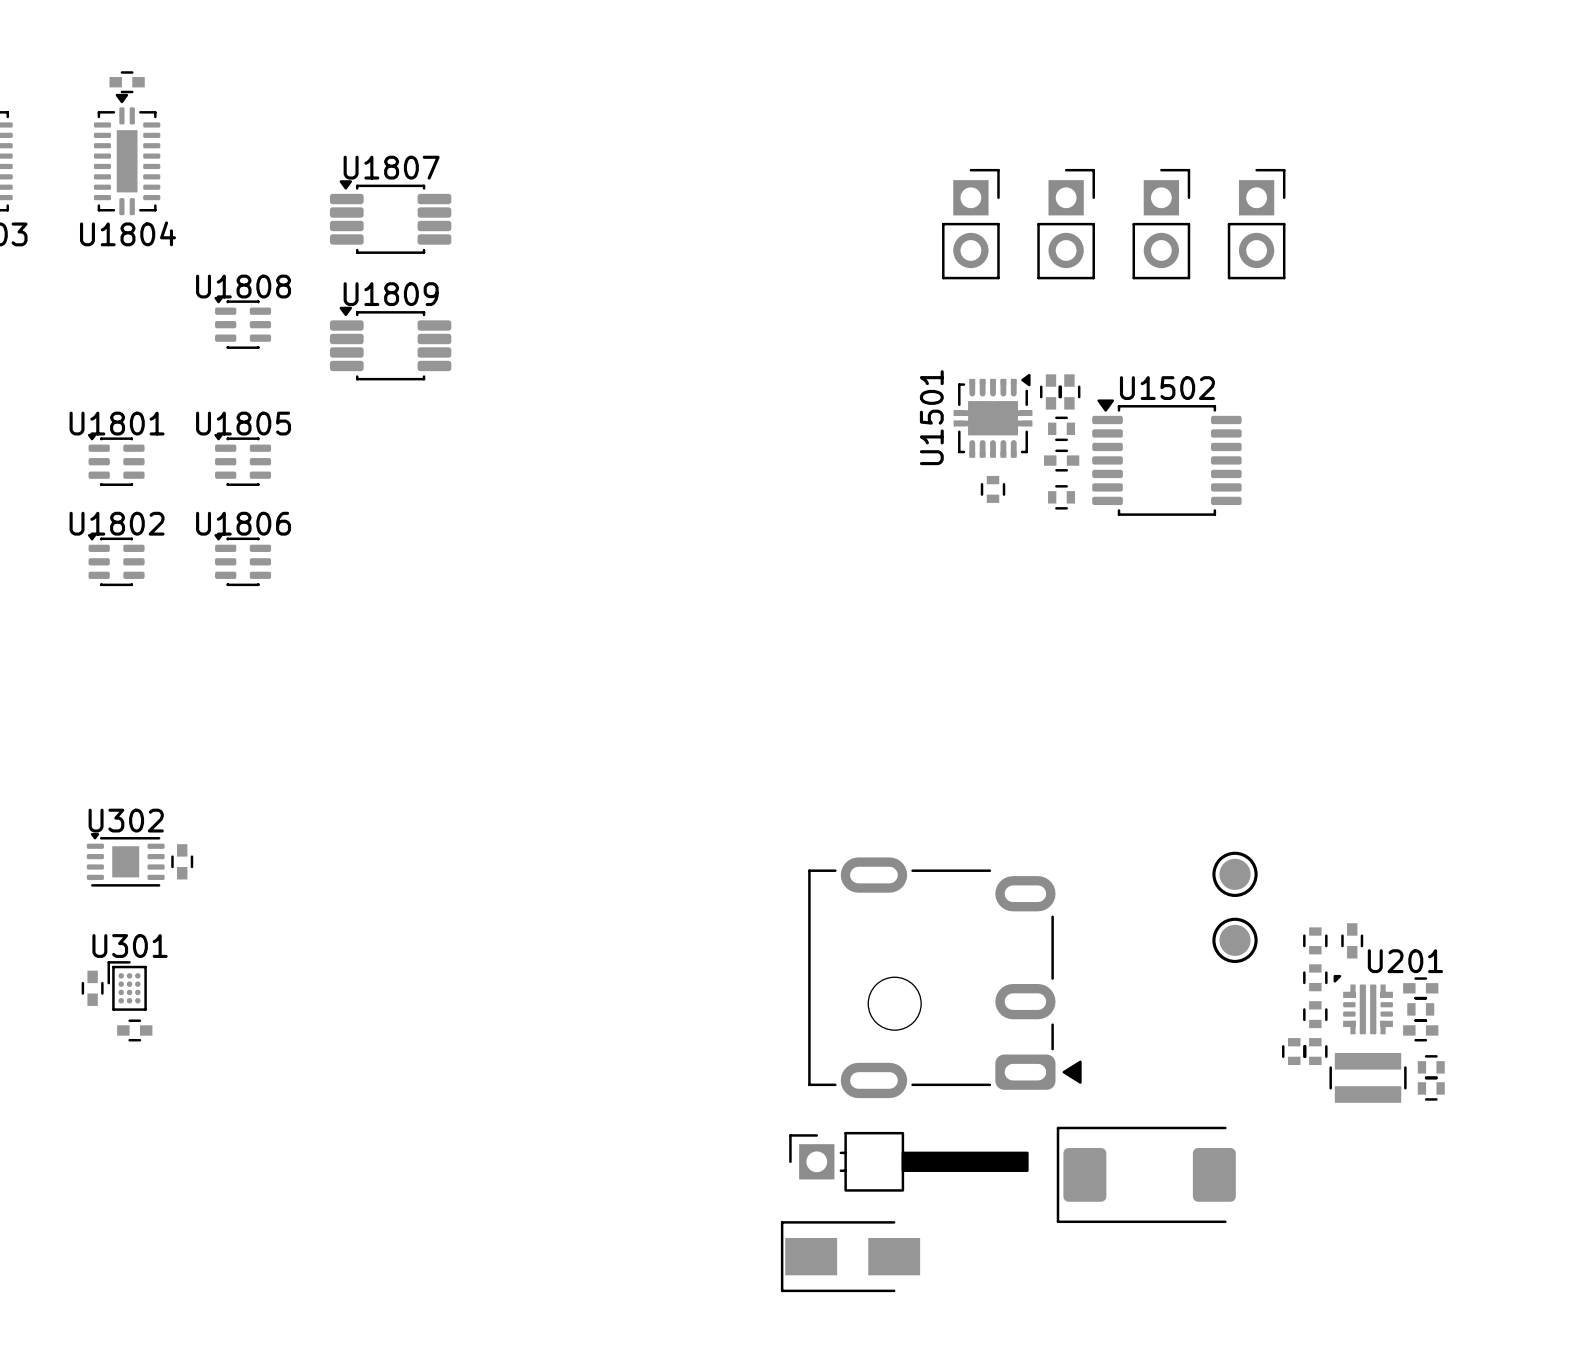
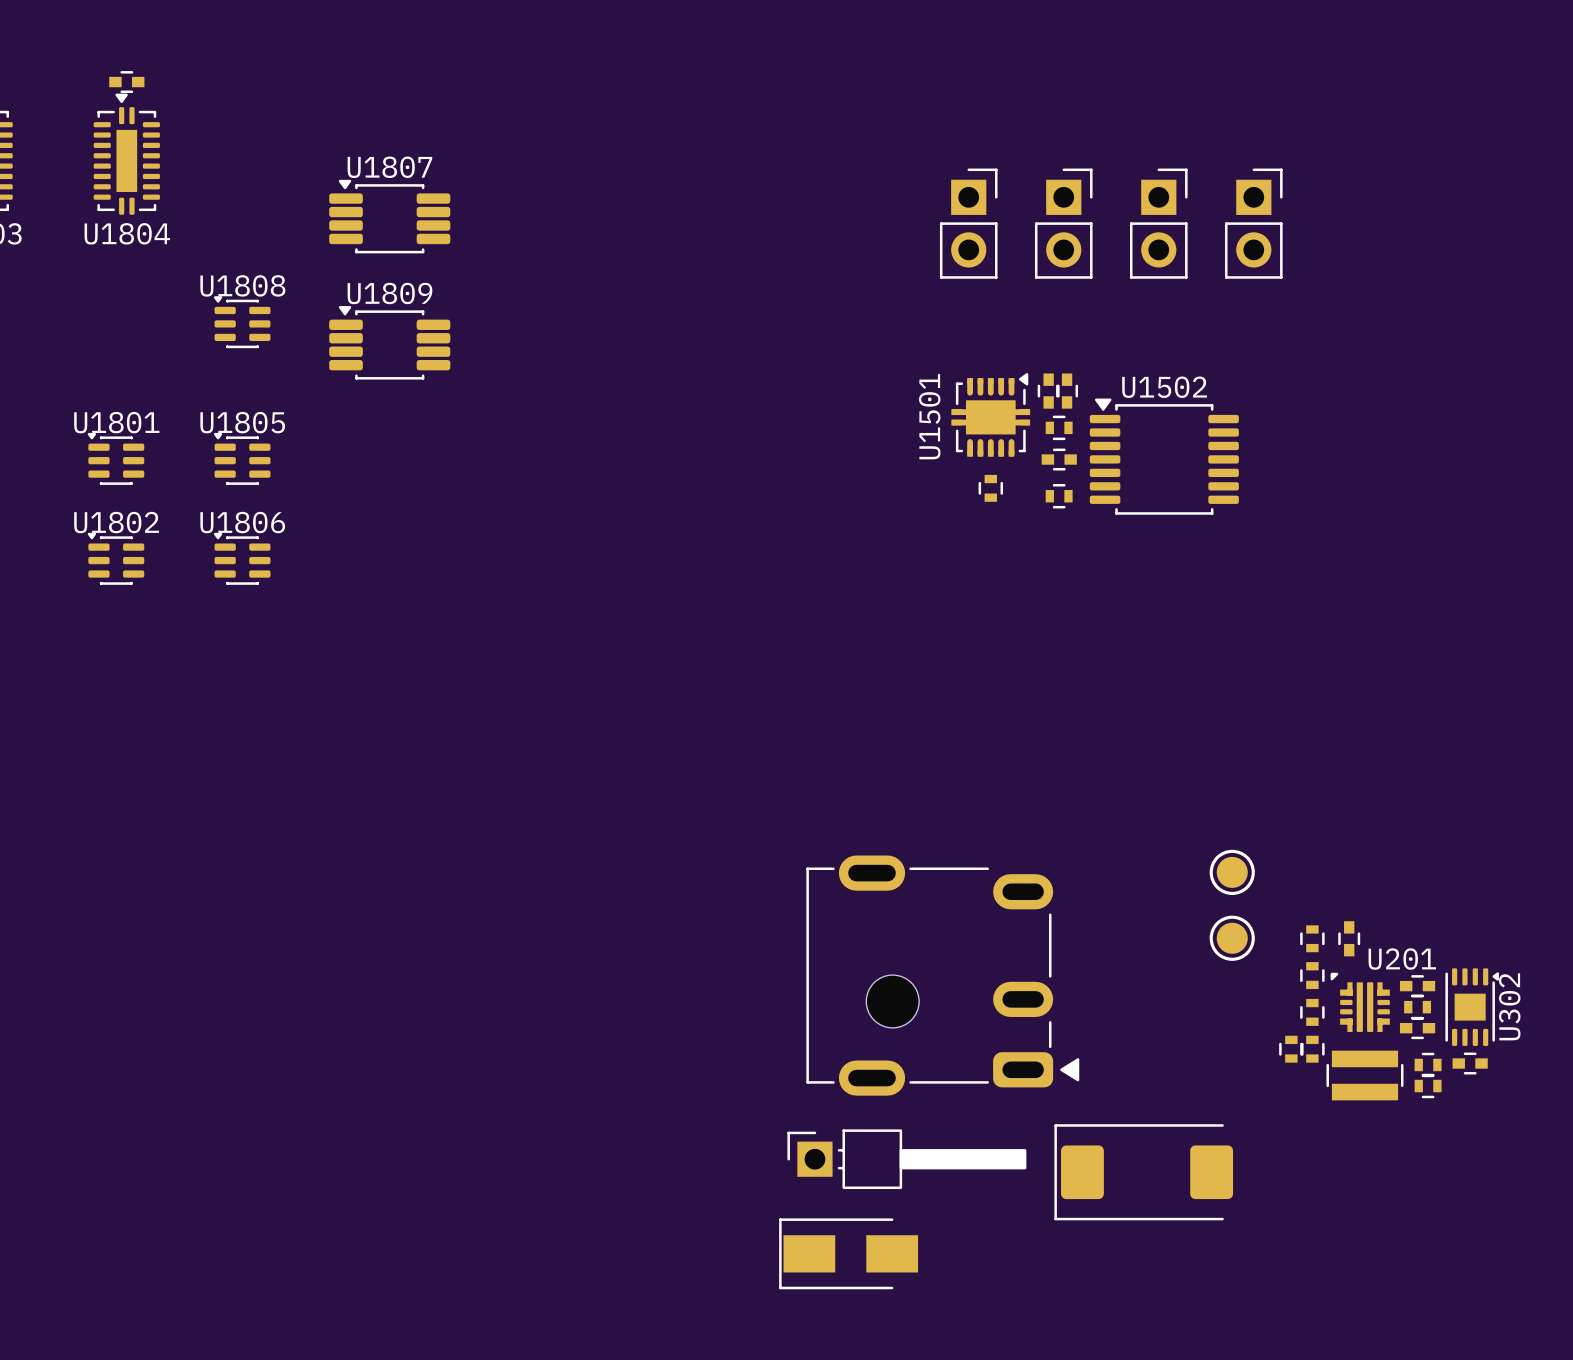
U302 rotation: 0° (125, 859) -> 90° clockwise (1472, 1007)
U302 position: (125, 859) -> (1472, 1007)
part: (182, 861) -> none
U301: (127, 985) -> none
part: (92, 988) -> none
part: (134, 1030) -> none
part: none -> (1470, 1063)

